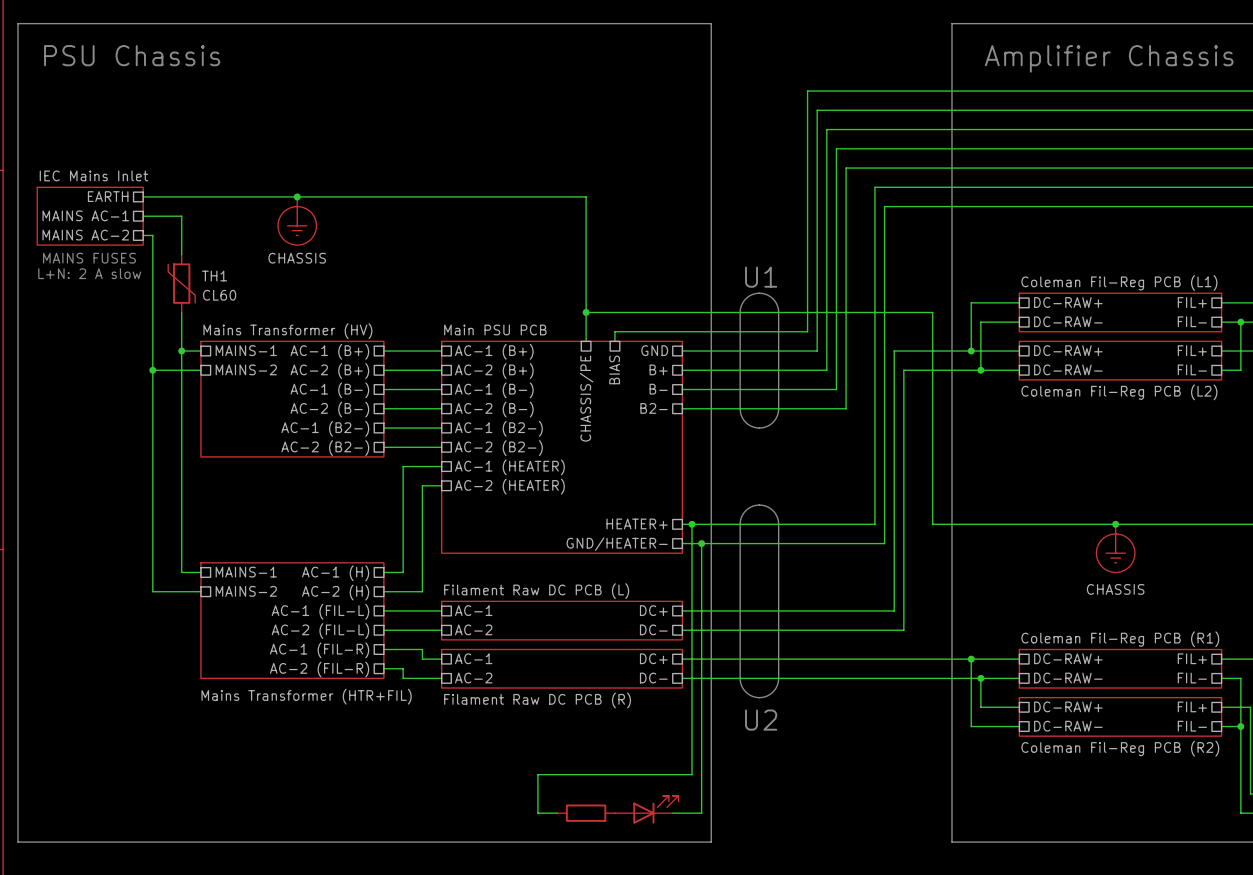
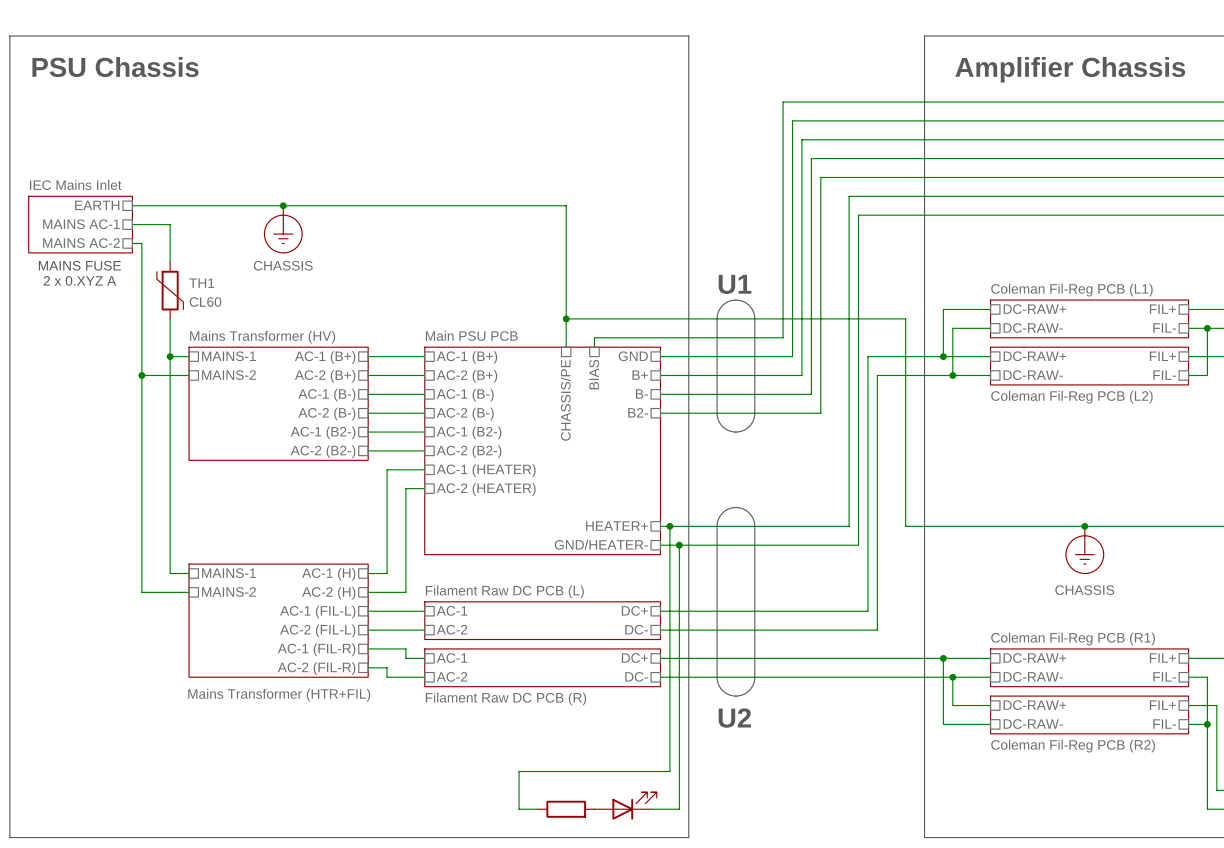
text: MAINS FUSES (89, 258) -> MAINS FUSE (79, 265)
text: L+N: 2 A slow (89, 273) -> 2 x 0.XYZ A (79, 280)

